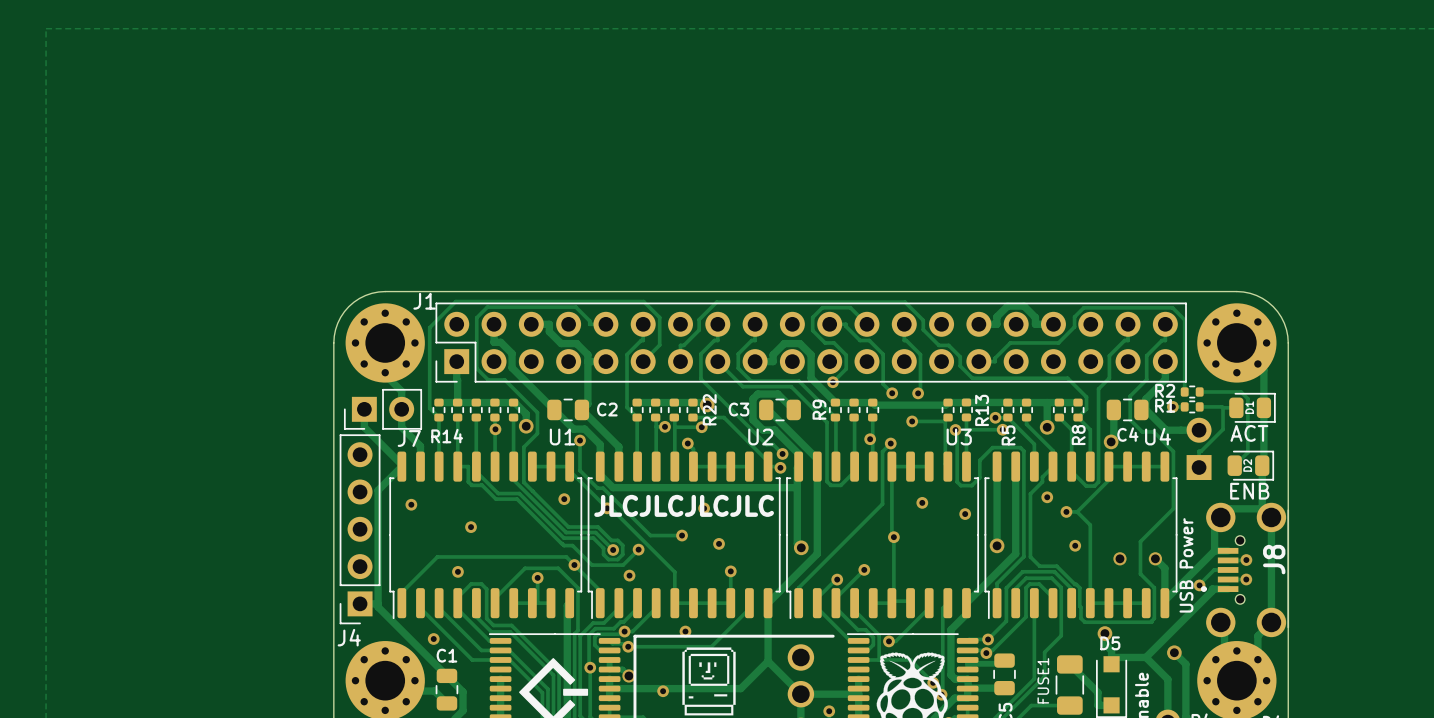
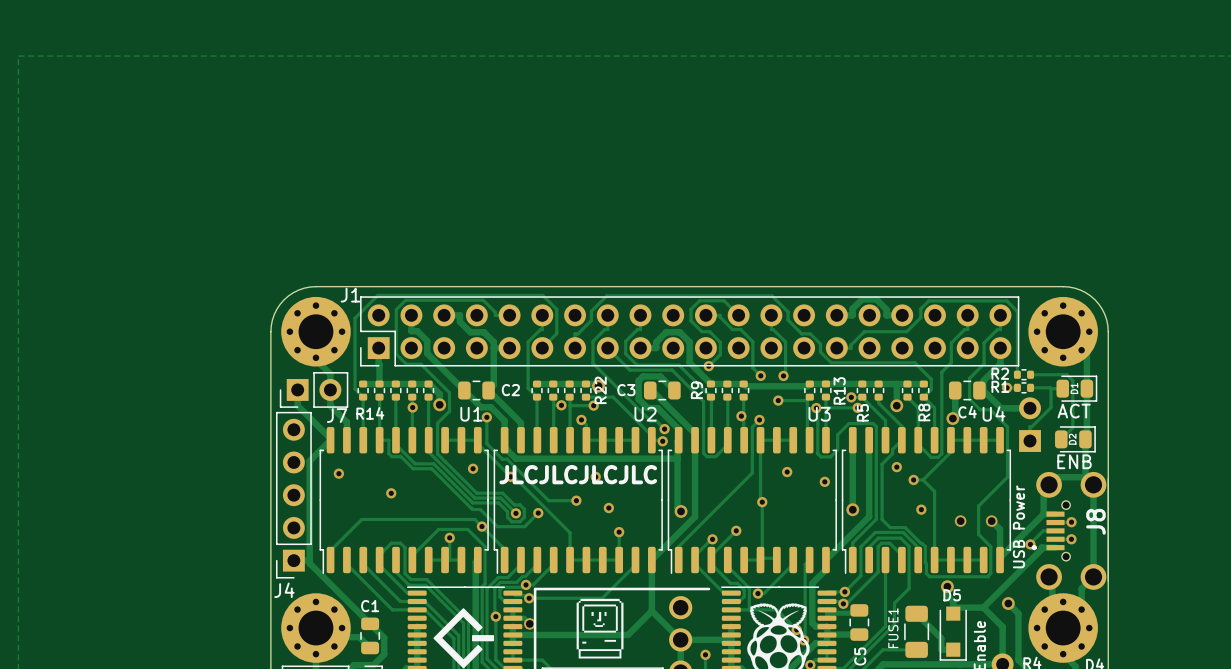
via: (457, 571) -> none
via: (629, 575) -> none
via: (685, 631) -> none
via: (433, 639) -> none
via: (663, 691) -> none

